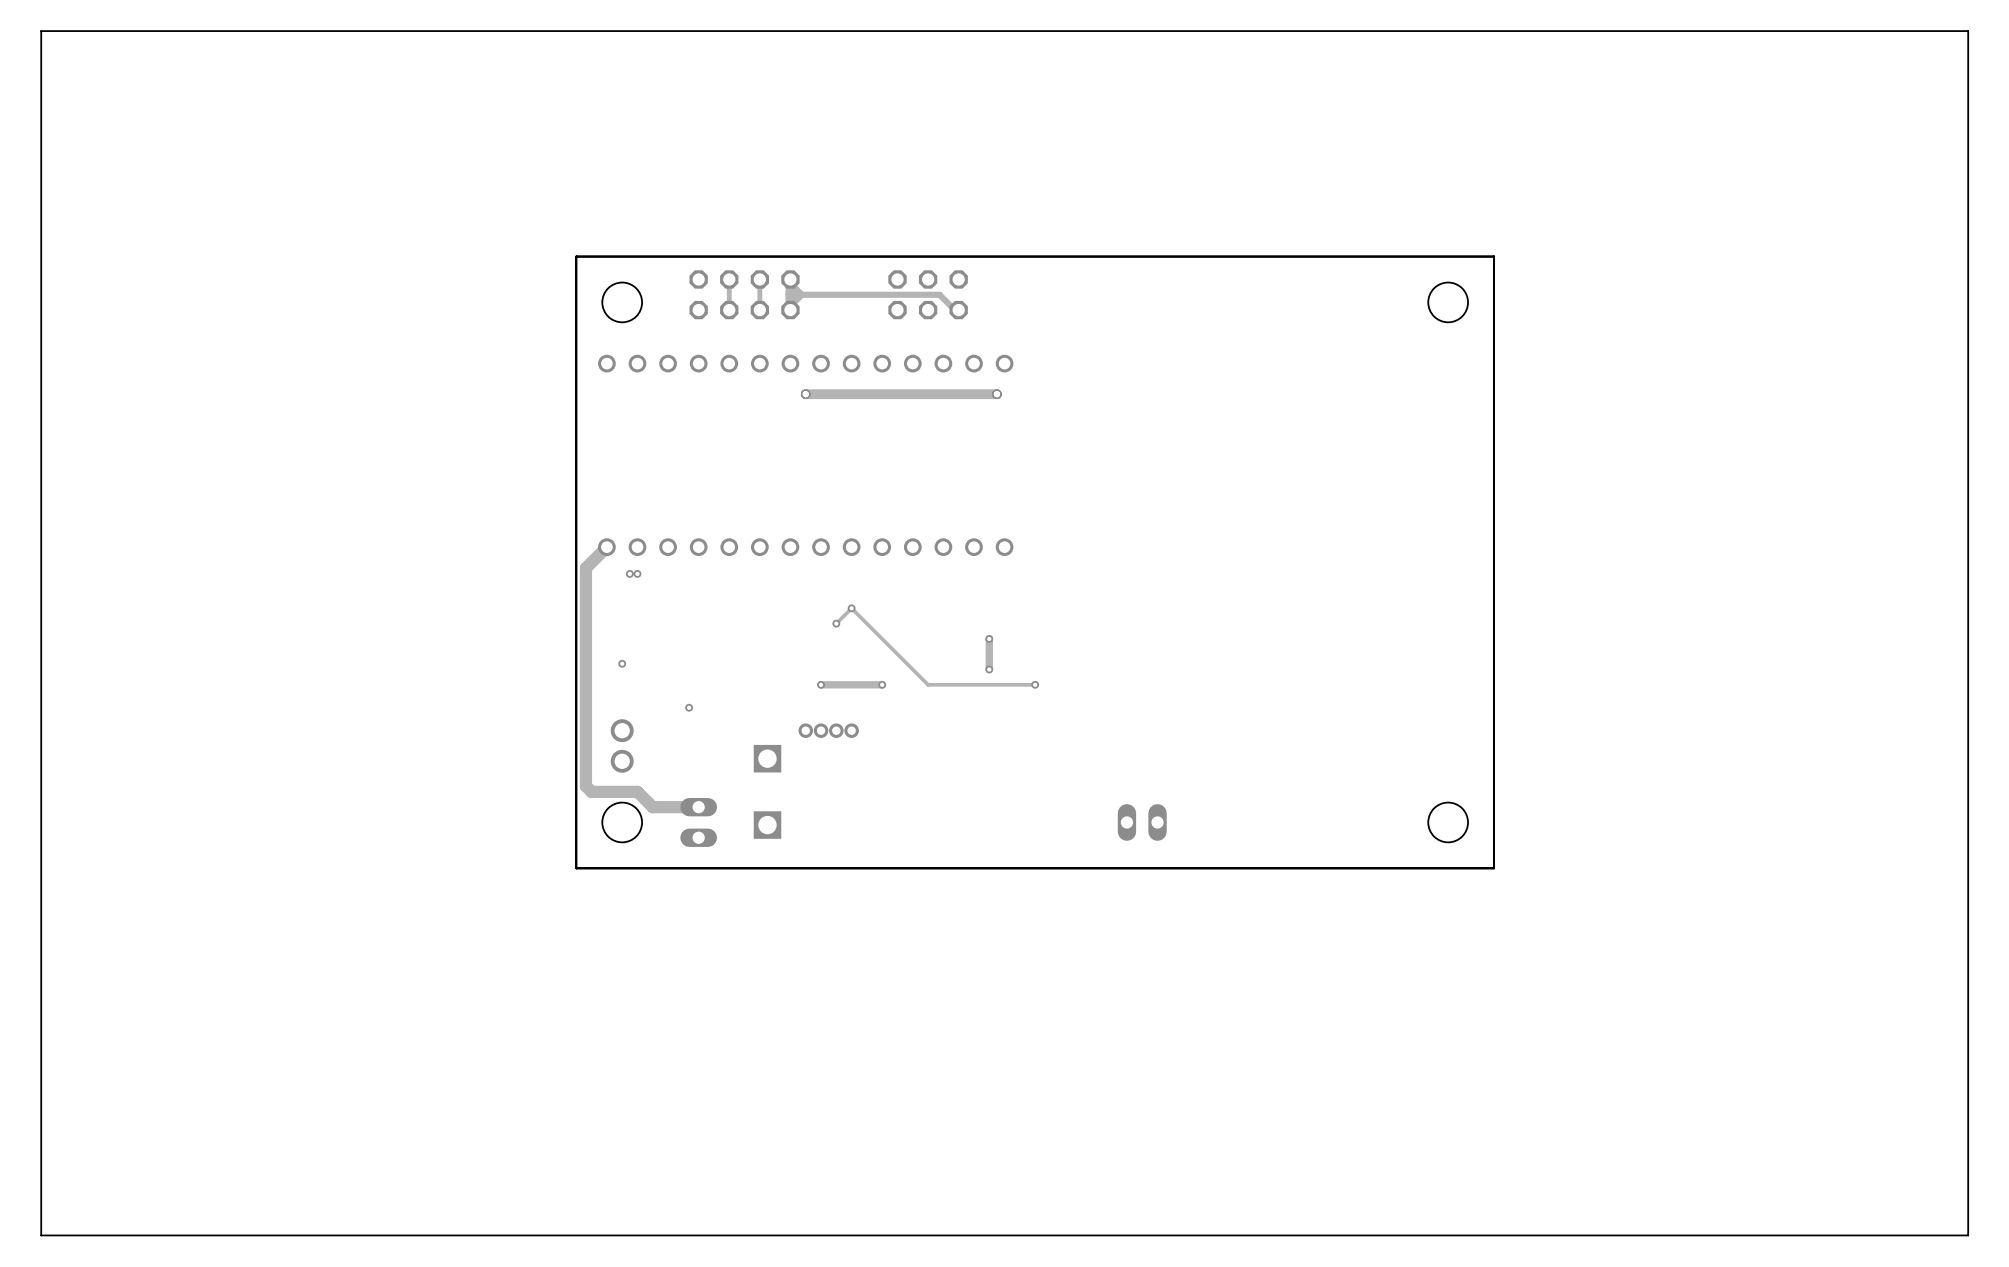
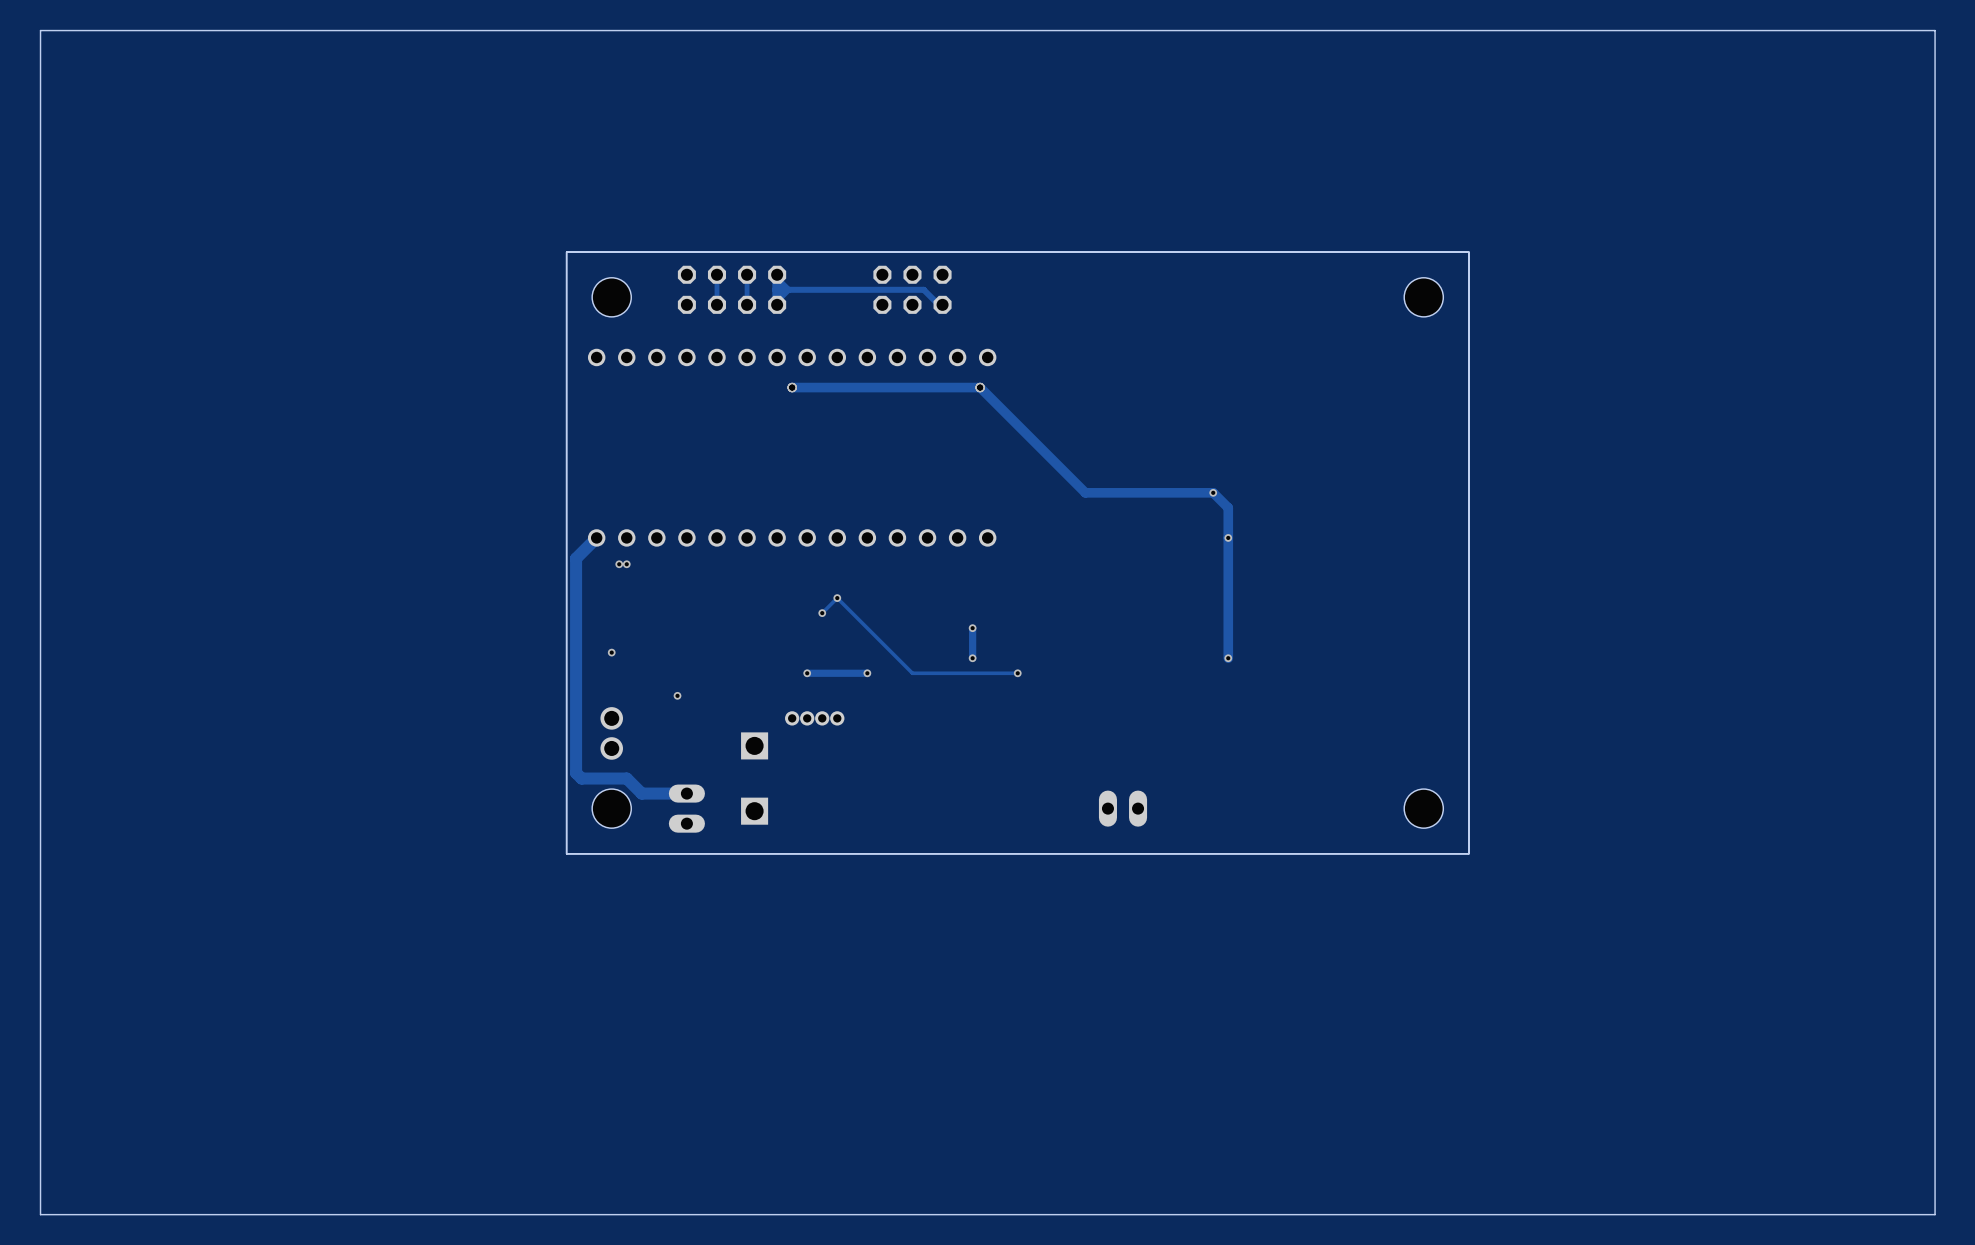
track: none -> (980, 387) (1085, 492) (1213, 492) (1228, 507) (1228, 658)
via: none -> (1213, 492)
via: none -> (1228, 537)
via: none -> (1228, 658)

